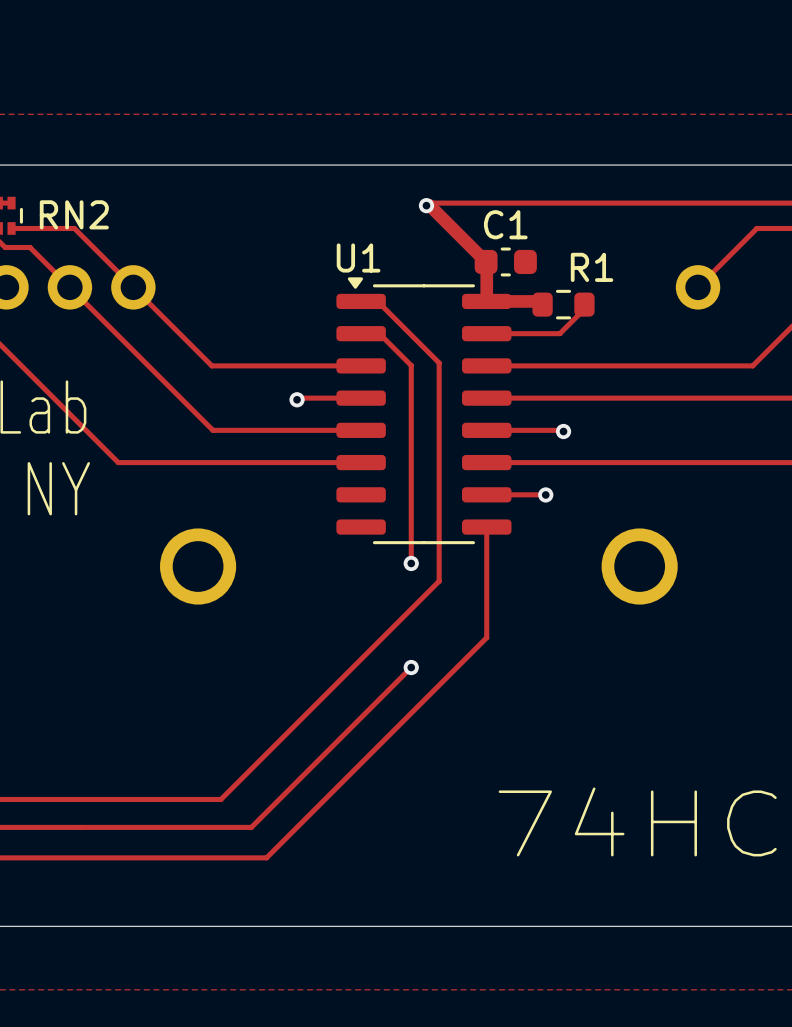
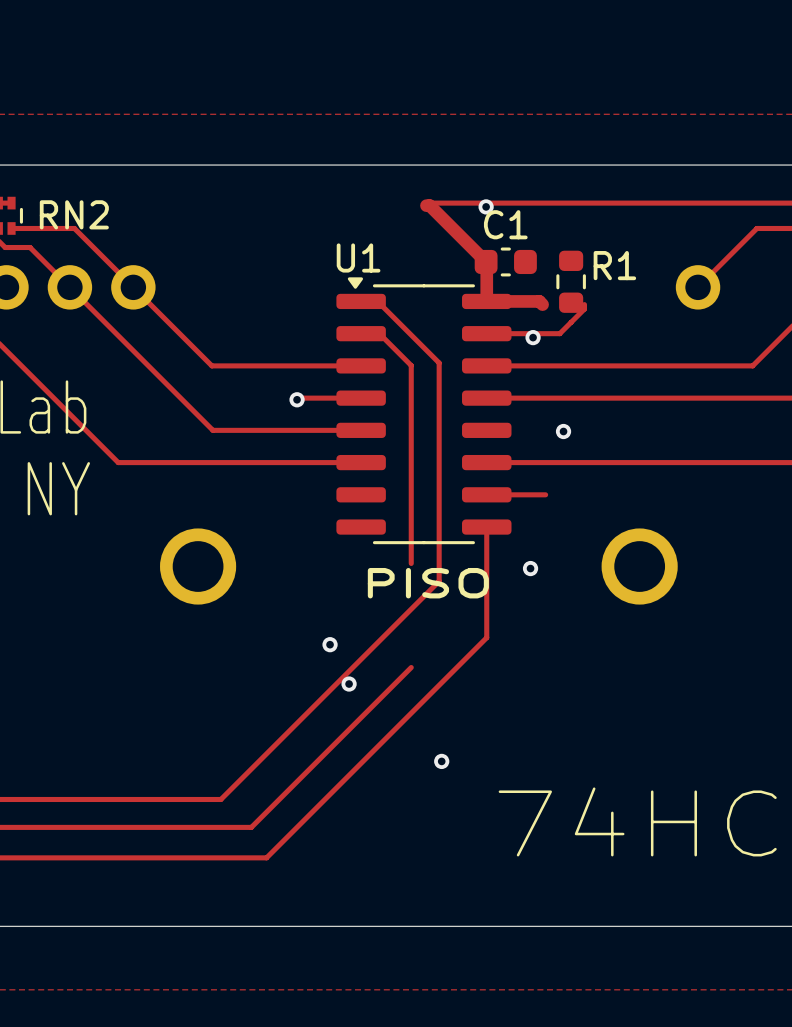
via position: (426, 205) -> (486, 206)
R1 rotation: 0° (563, 304) -> 90° clockwise (571, 281)
via: none -> (533, 337)
track: (486, 430) (563, 431) -> none
via: (545, 494) -> none
via: (411, 563) -> none
via: none -> (530, 568)
text: none -> PISO (428, 583)
via: none -> (330, 644)
via: (411, 667) -> none
via: none -> (349, 684)
via: none -> (441, 761)

